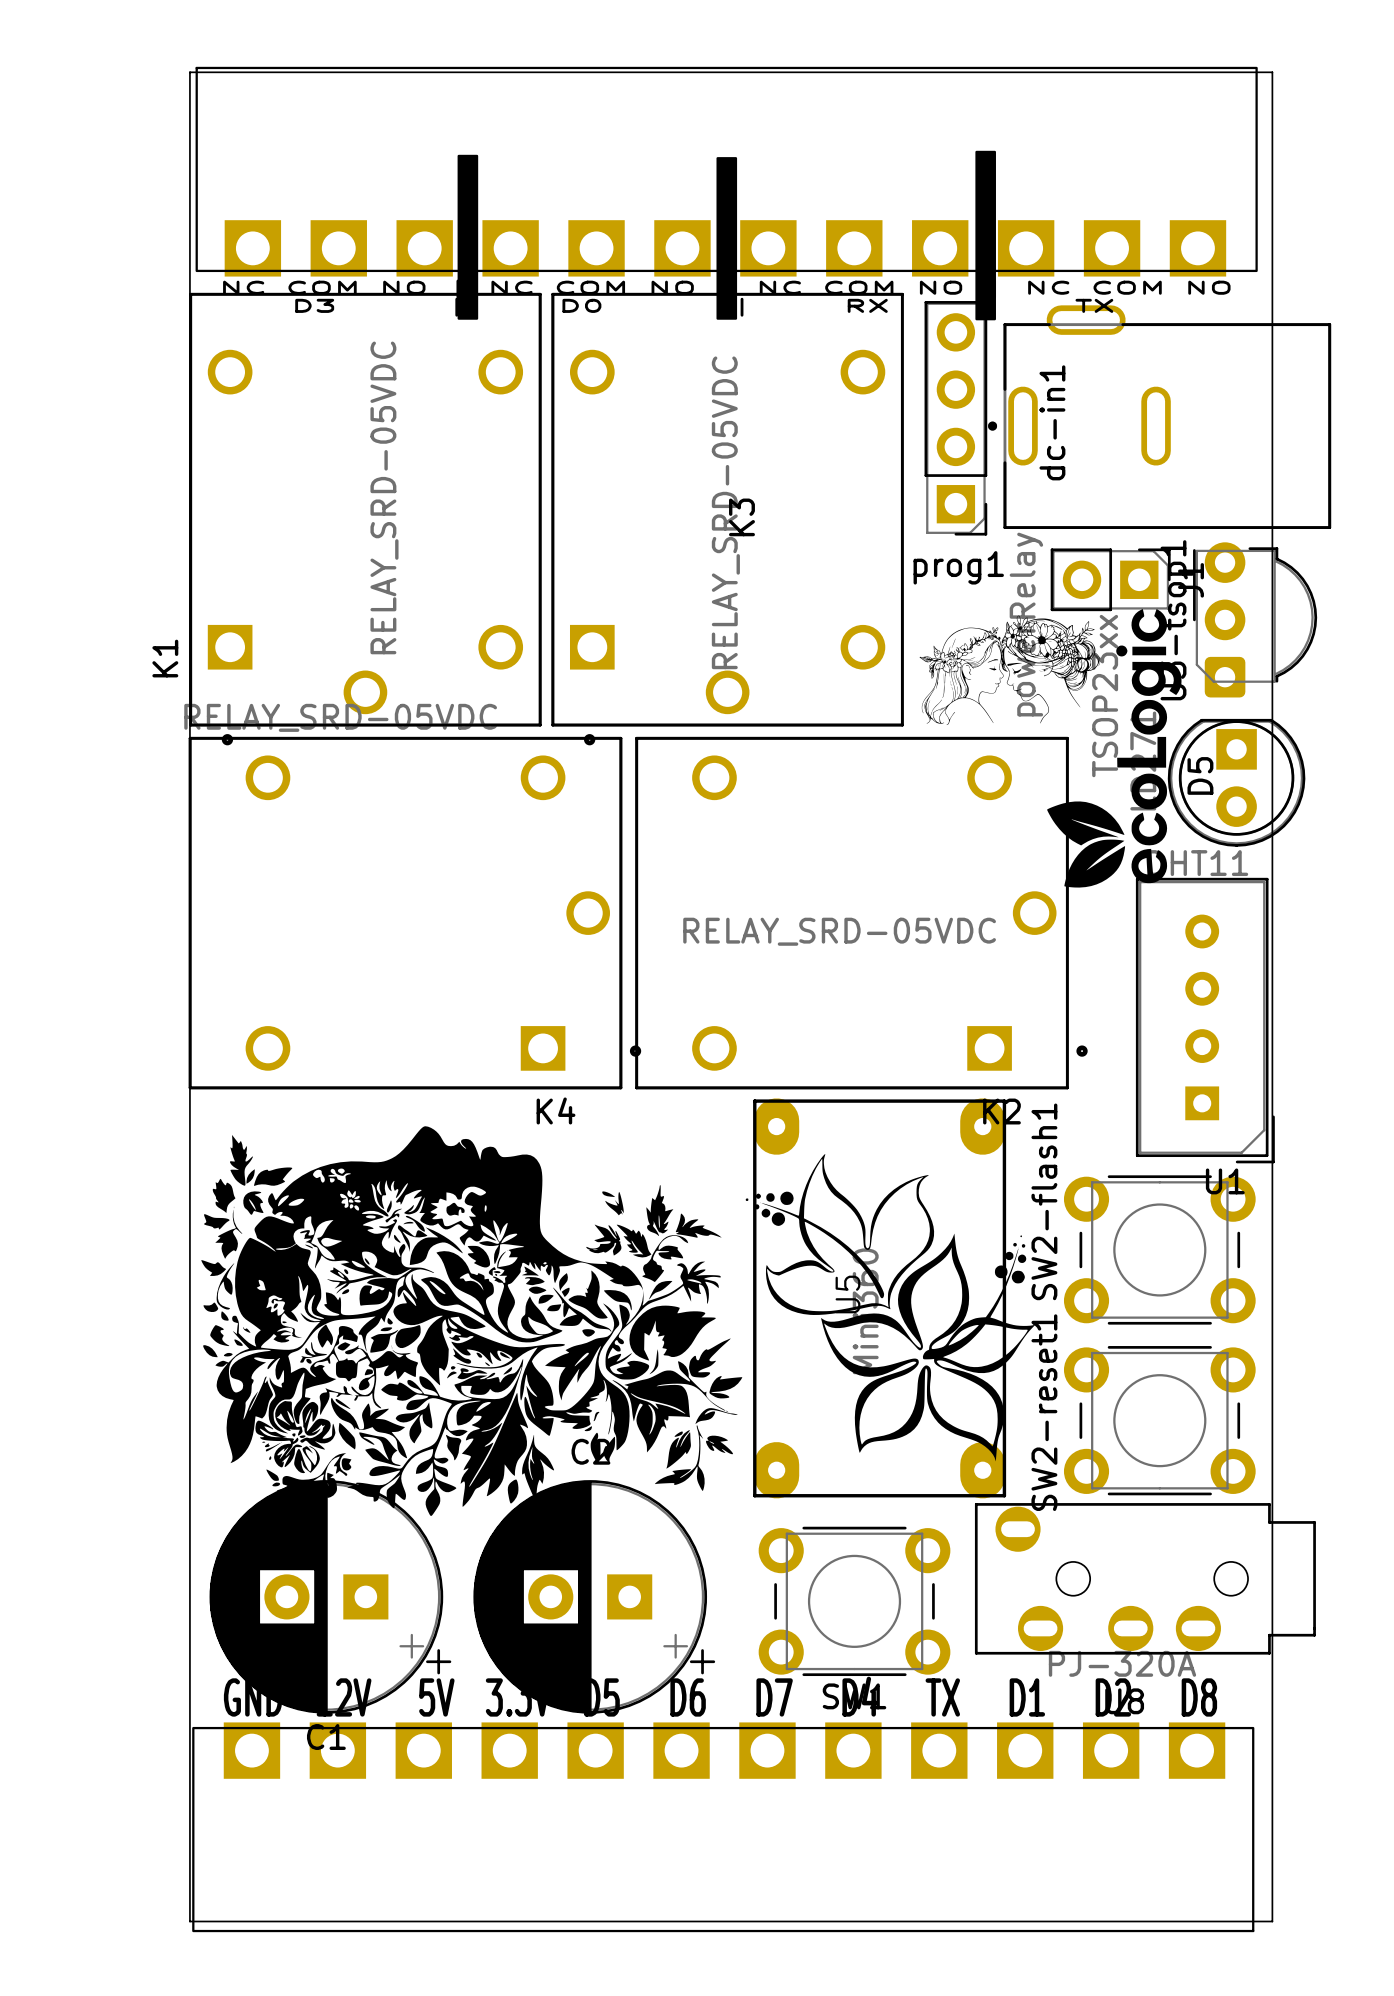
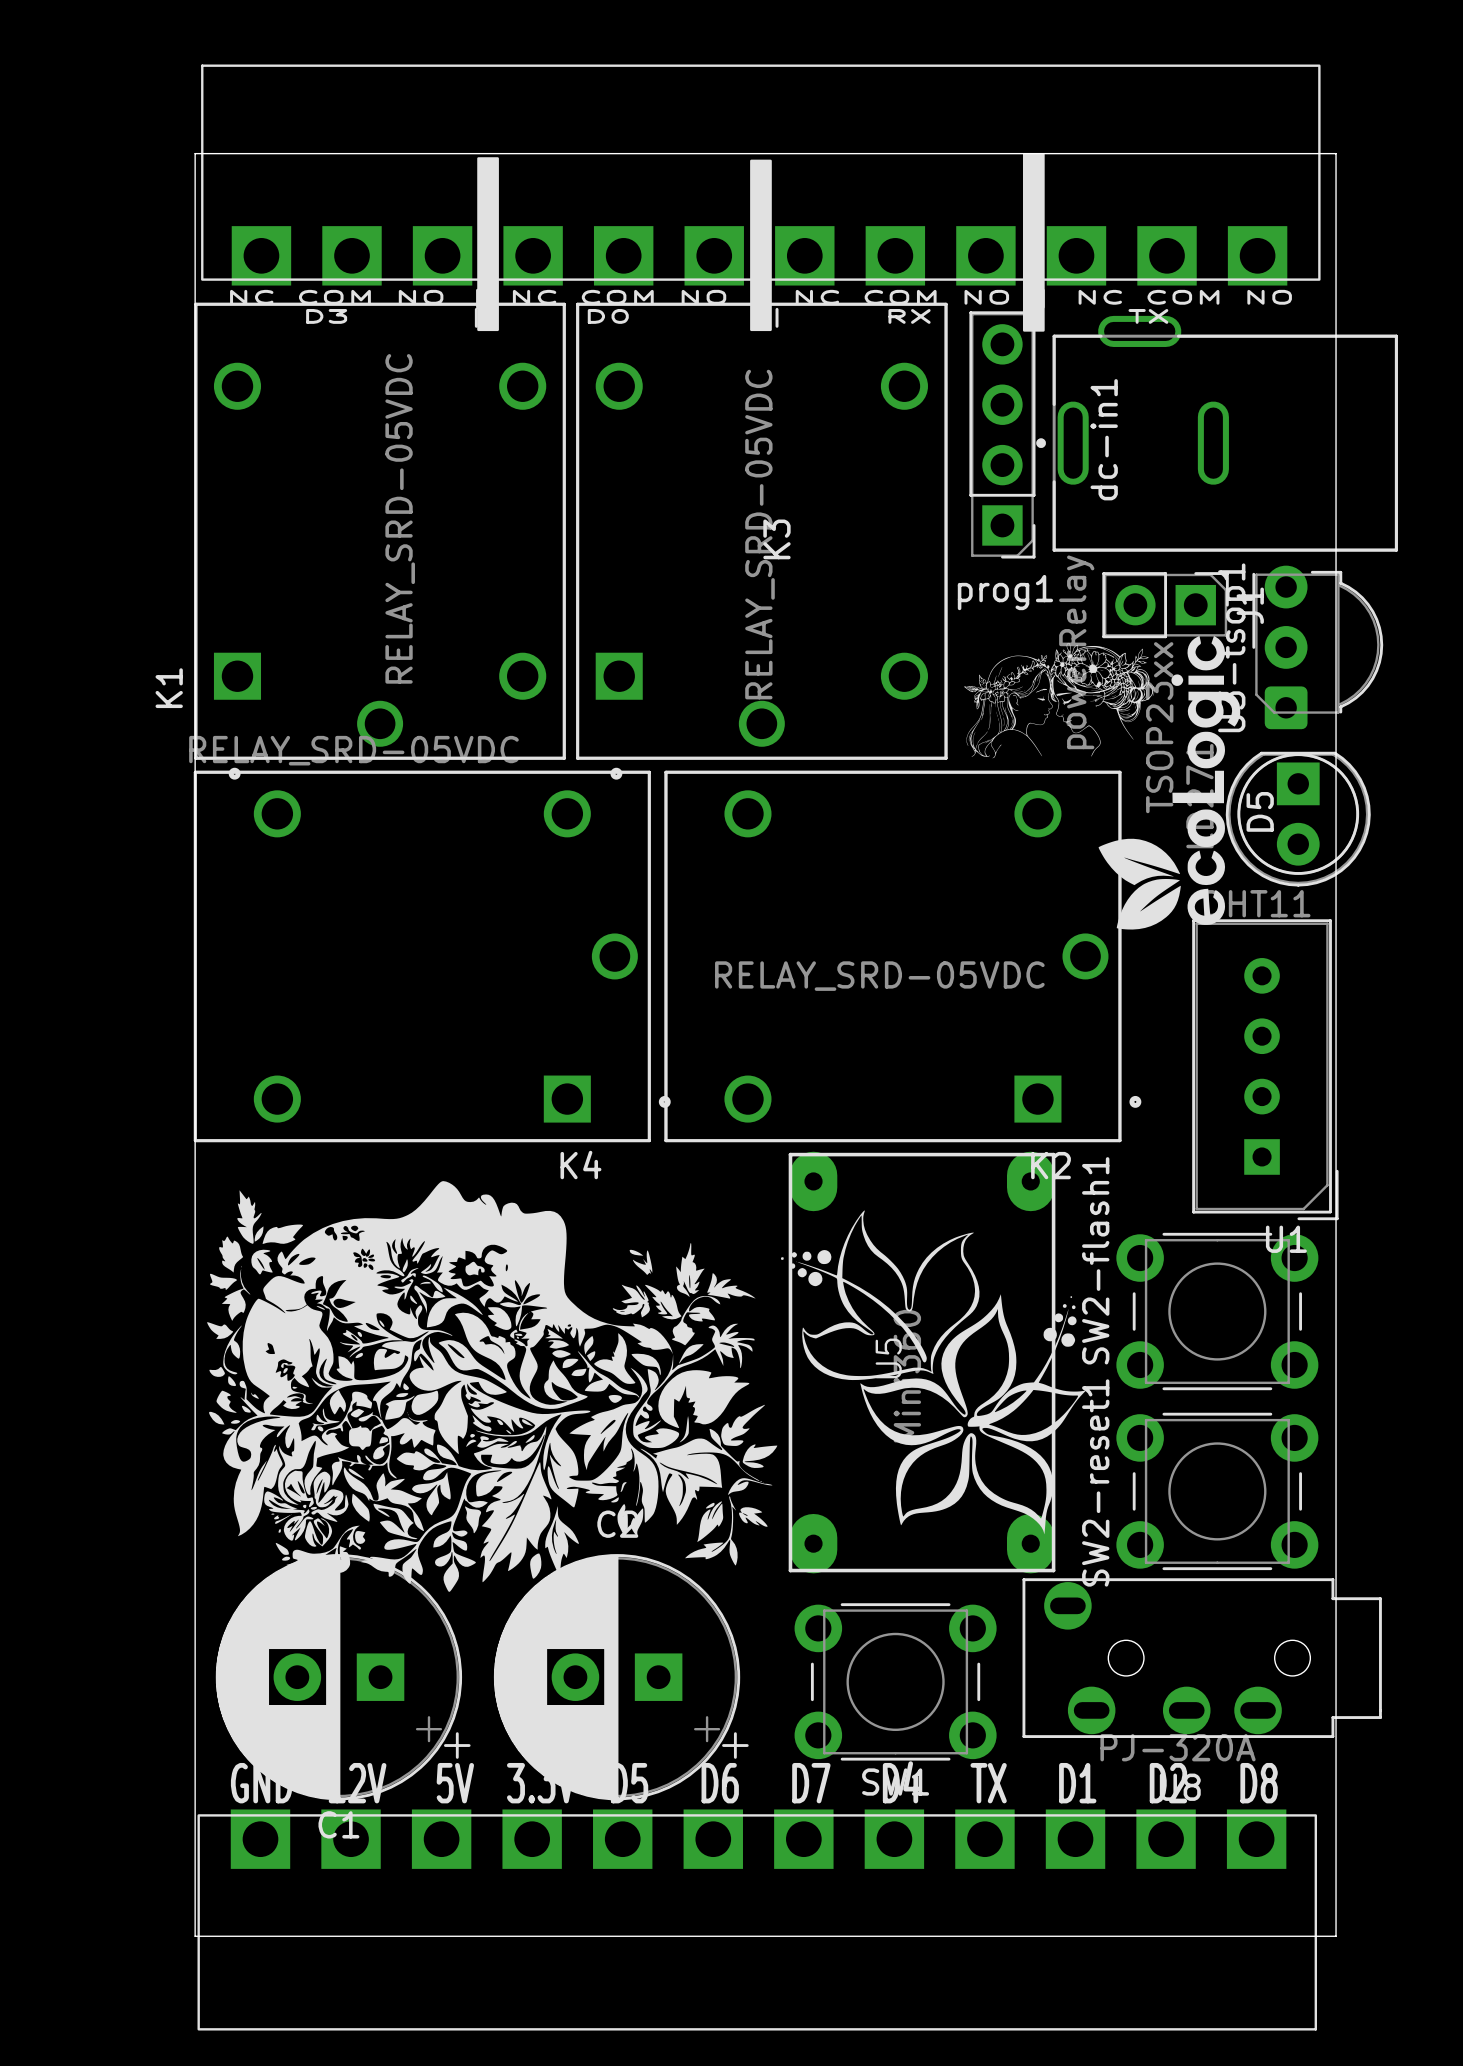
board edge: (189, 151) (189, 72) (1272, 72) (1272, 151) -> (195, 153) (1336, 153)
board edge: (189, 1842) (189, 1921) (1272, 1921) (1272, 1842) -> (195, 1936) (1336, 1936)

